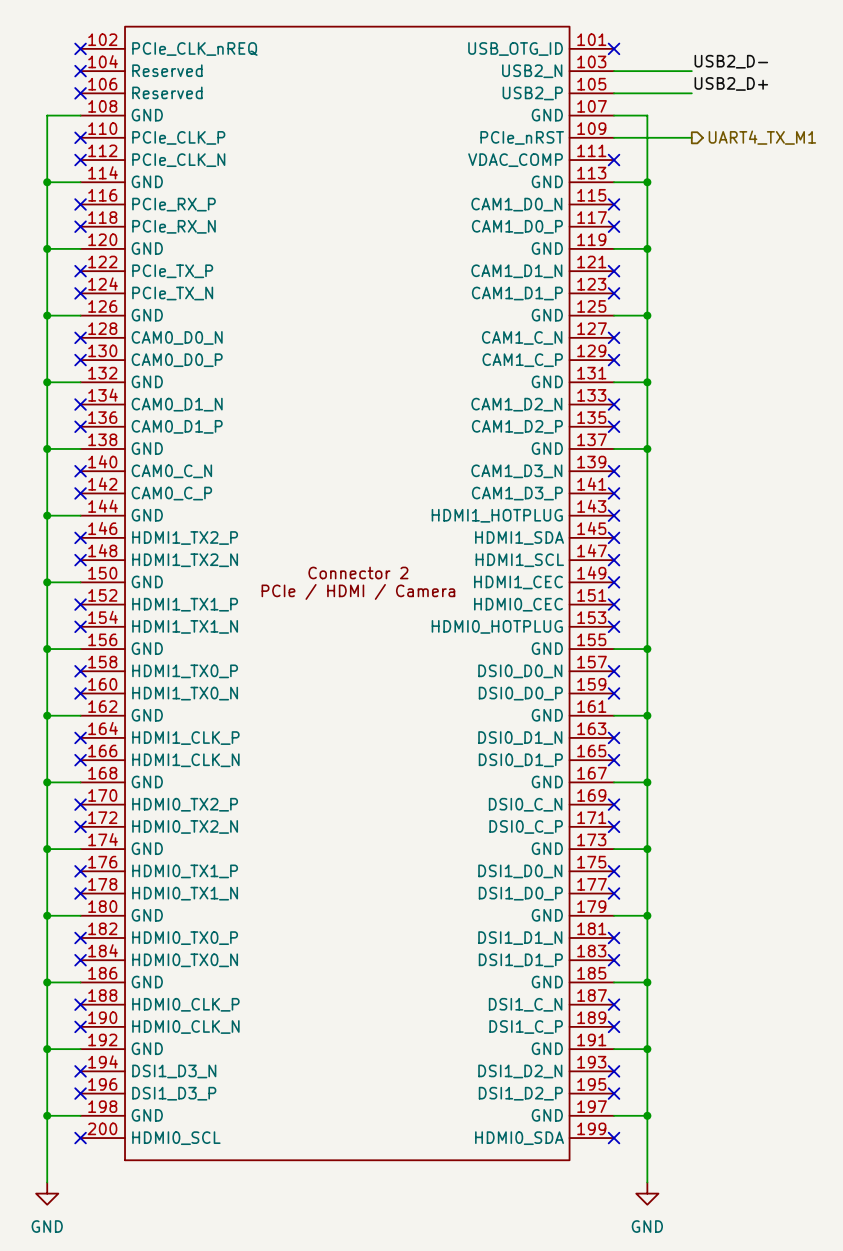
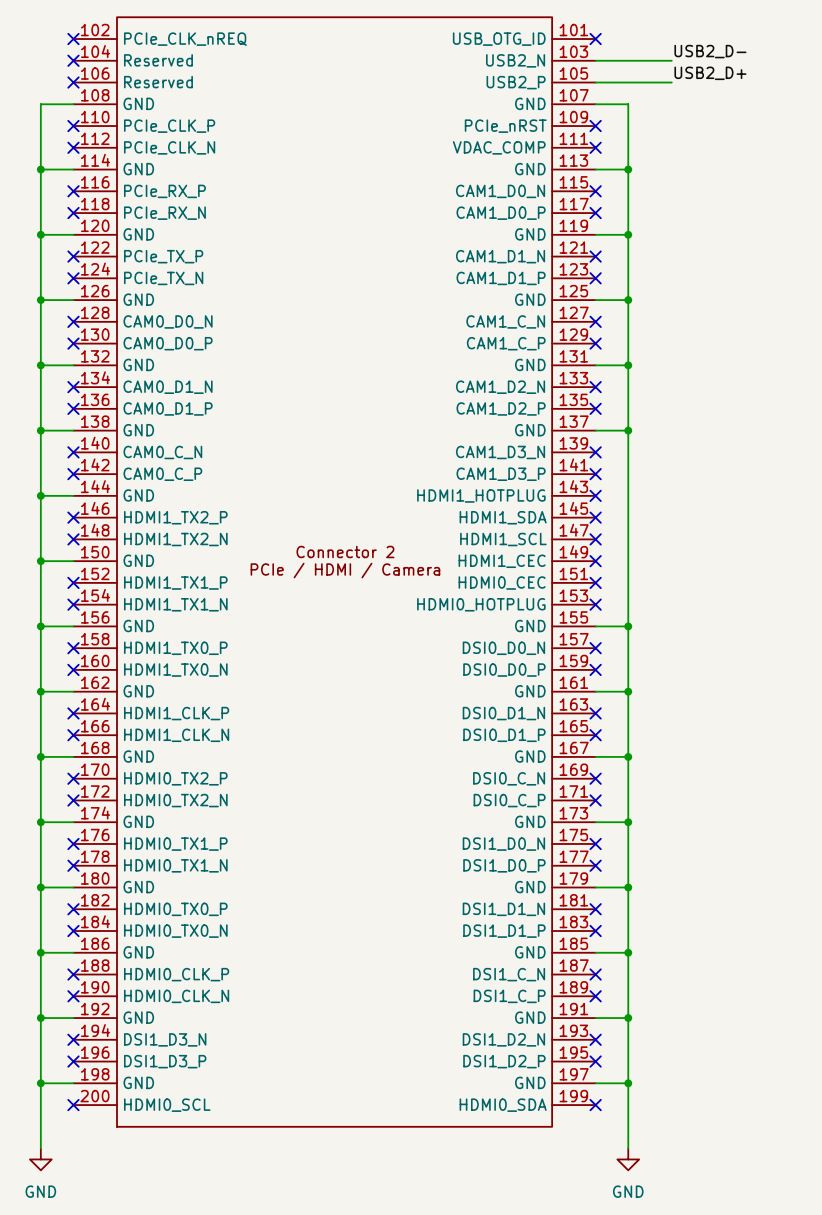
wire: (614, 137) (691, 137) -> none
no-connect mark: none -> (595, 126)
hierarchical label: UART4_TX_M1 (762, 137) -> none

